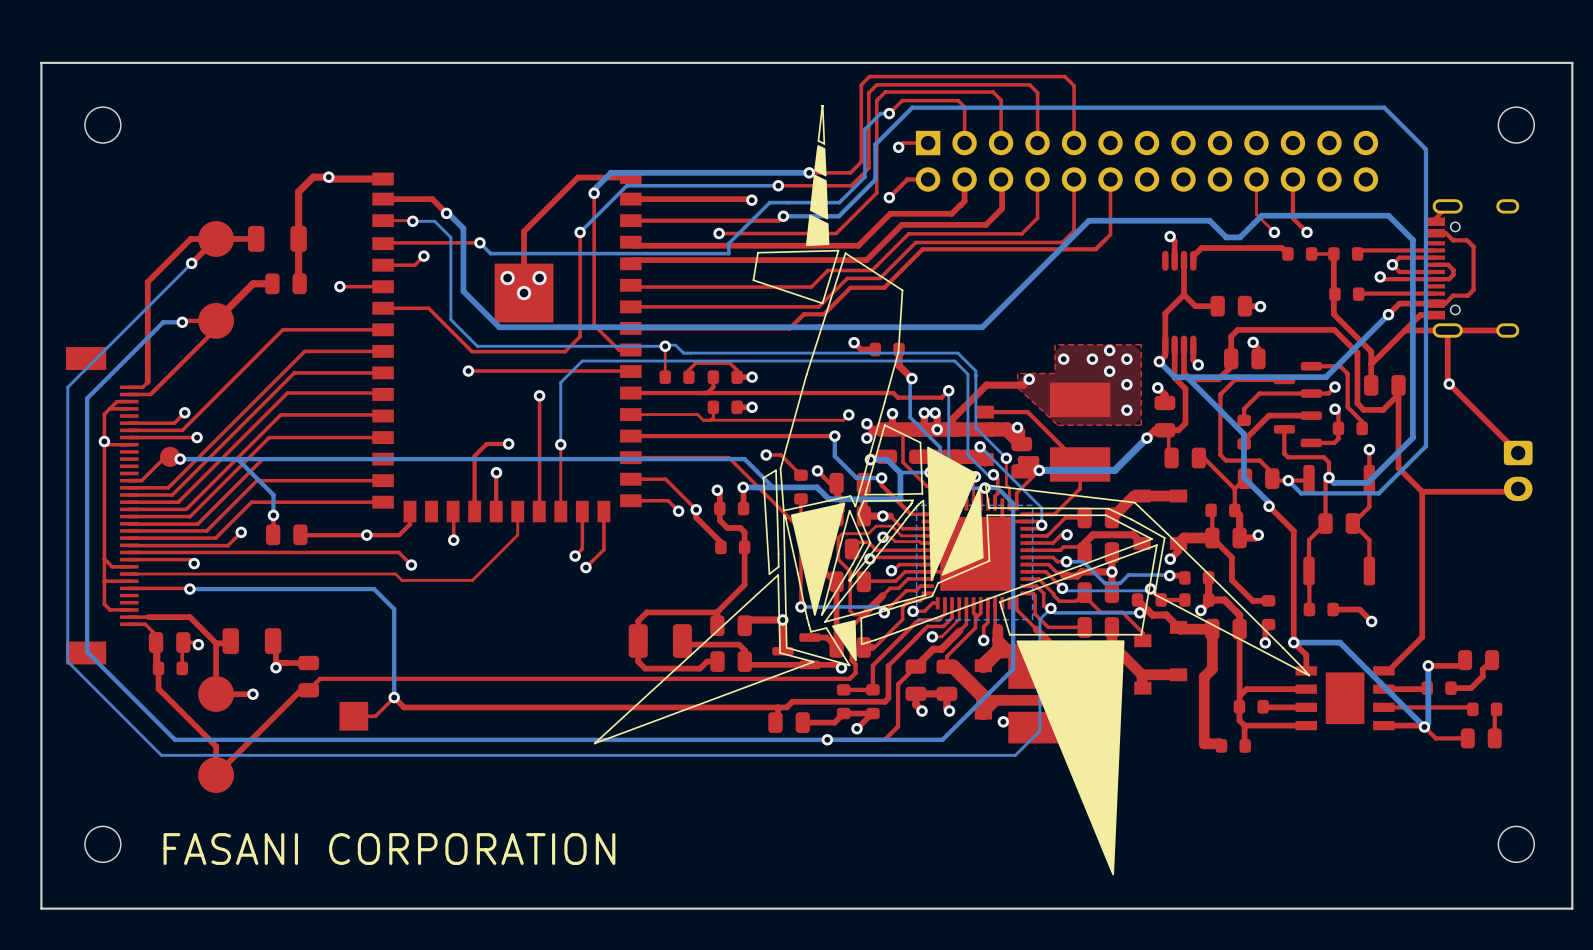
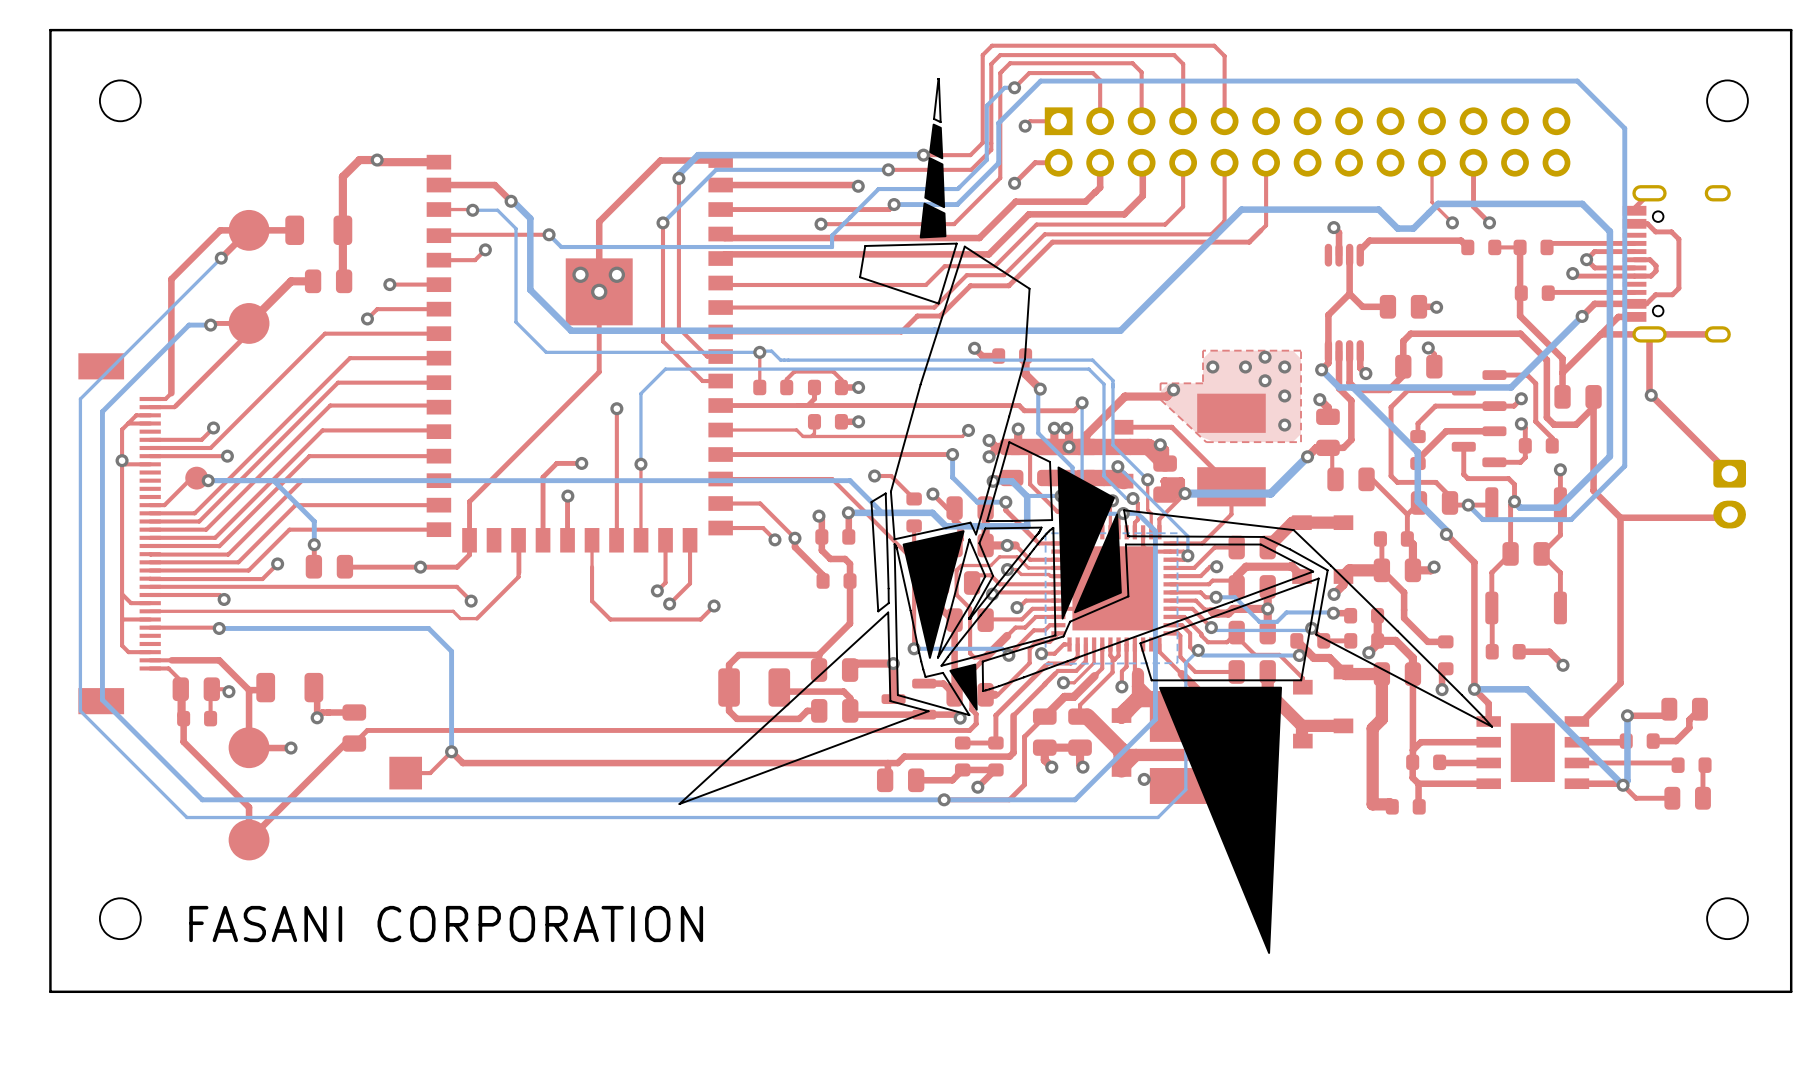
top track: none -> (599, 291) (599, 372) (469, 501) (469, 540)
top track: (383, 308) (428, 308) (472, 351) (565, 351) (580, 336) -> (438, 309) (377, 309) (367, 318)
via: none -> (367, 318)
top track: (468, 371) (630, 371) -> (663, 341) (702, 381) (720, 381)
via: (468, 371) -> none
top track: (517, 535) (472, 580) (416, 580) -> (518, 540) (518, 577) (476, 618)
top track: none -> (592, 567) (592, 601) (610, 619) (700, 619) (714, 606)
via: (453, 540) -> none
via: none -> (714, 606)

